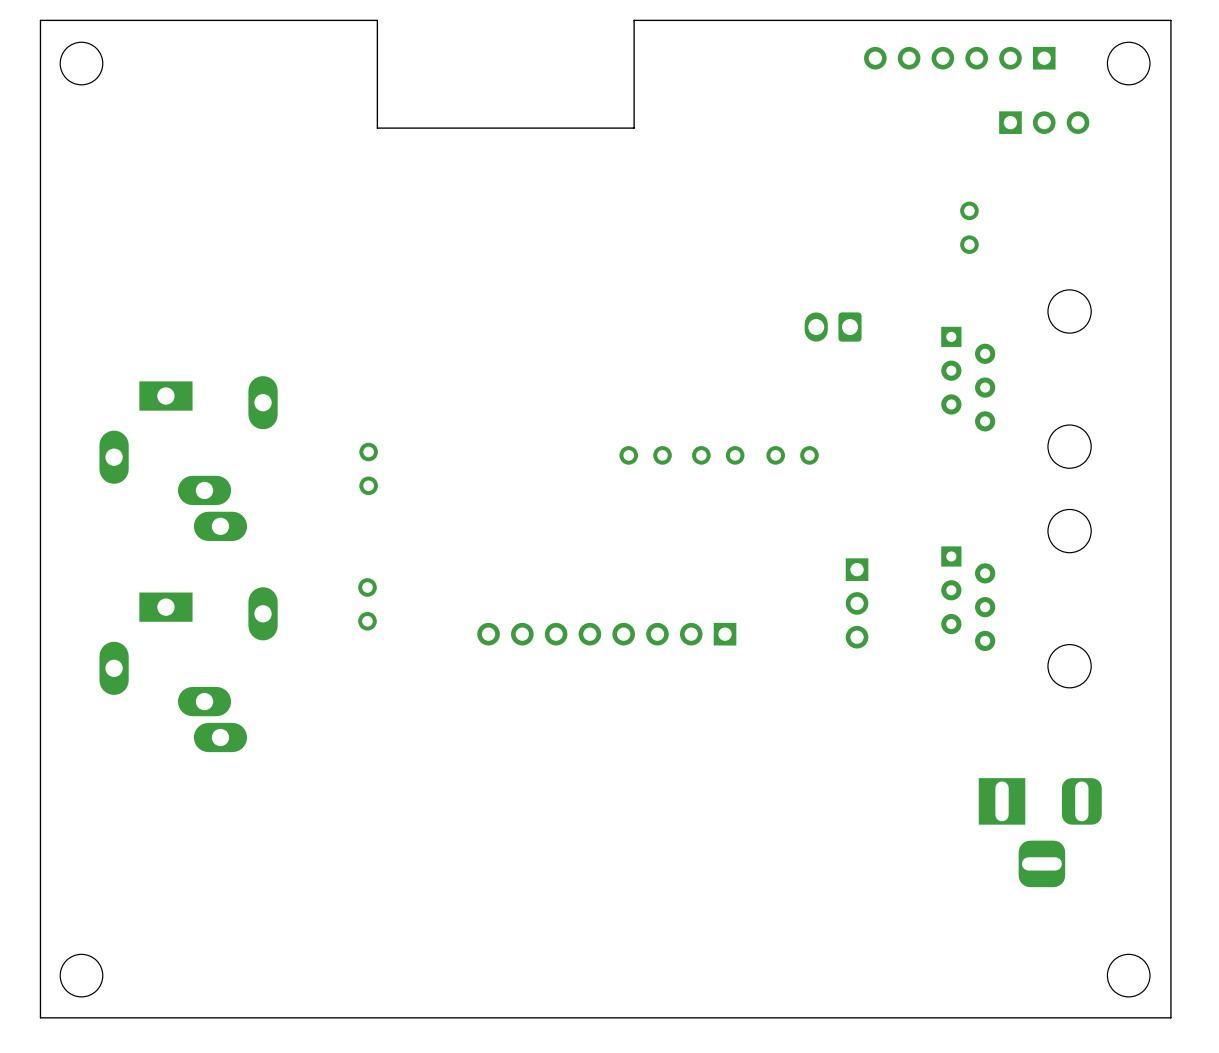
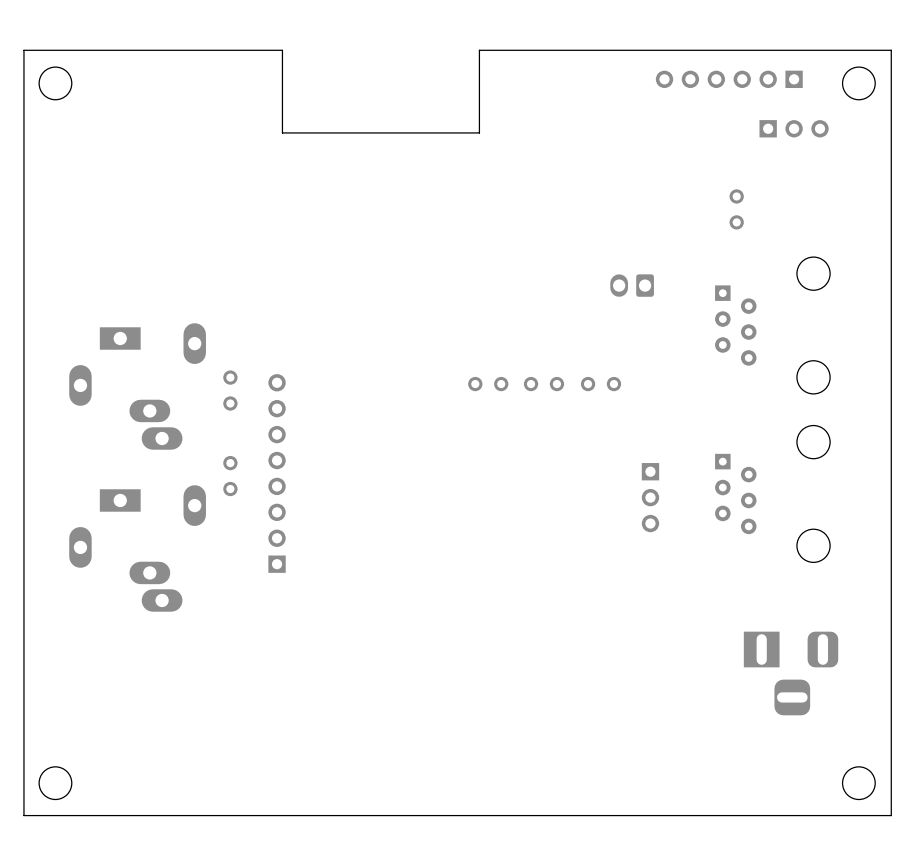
part position: (368, 468) -> (230, 390)
part: none -> (230, 476)
part: (367, 604) -> none
part rotation: 0° (606, 634) -> 90° clockwise (277, 473)
part position: (606, 634) -> (277, 473)

